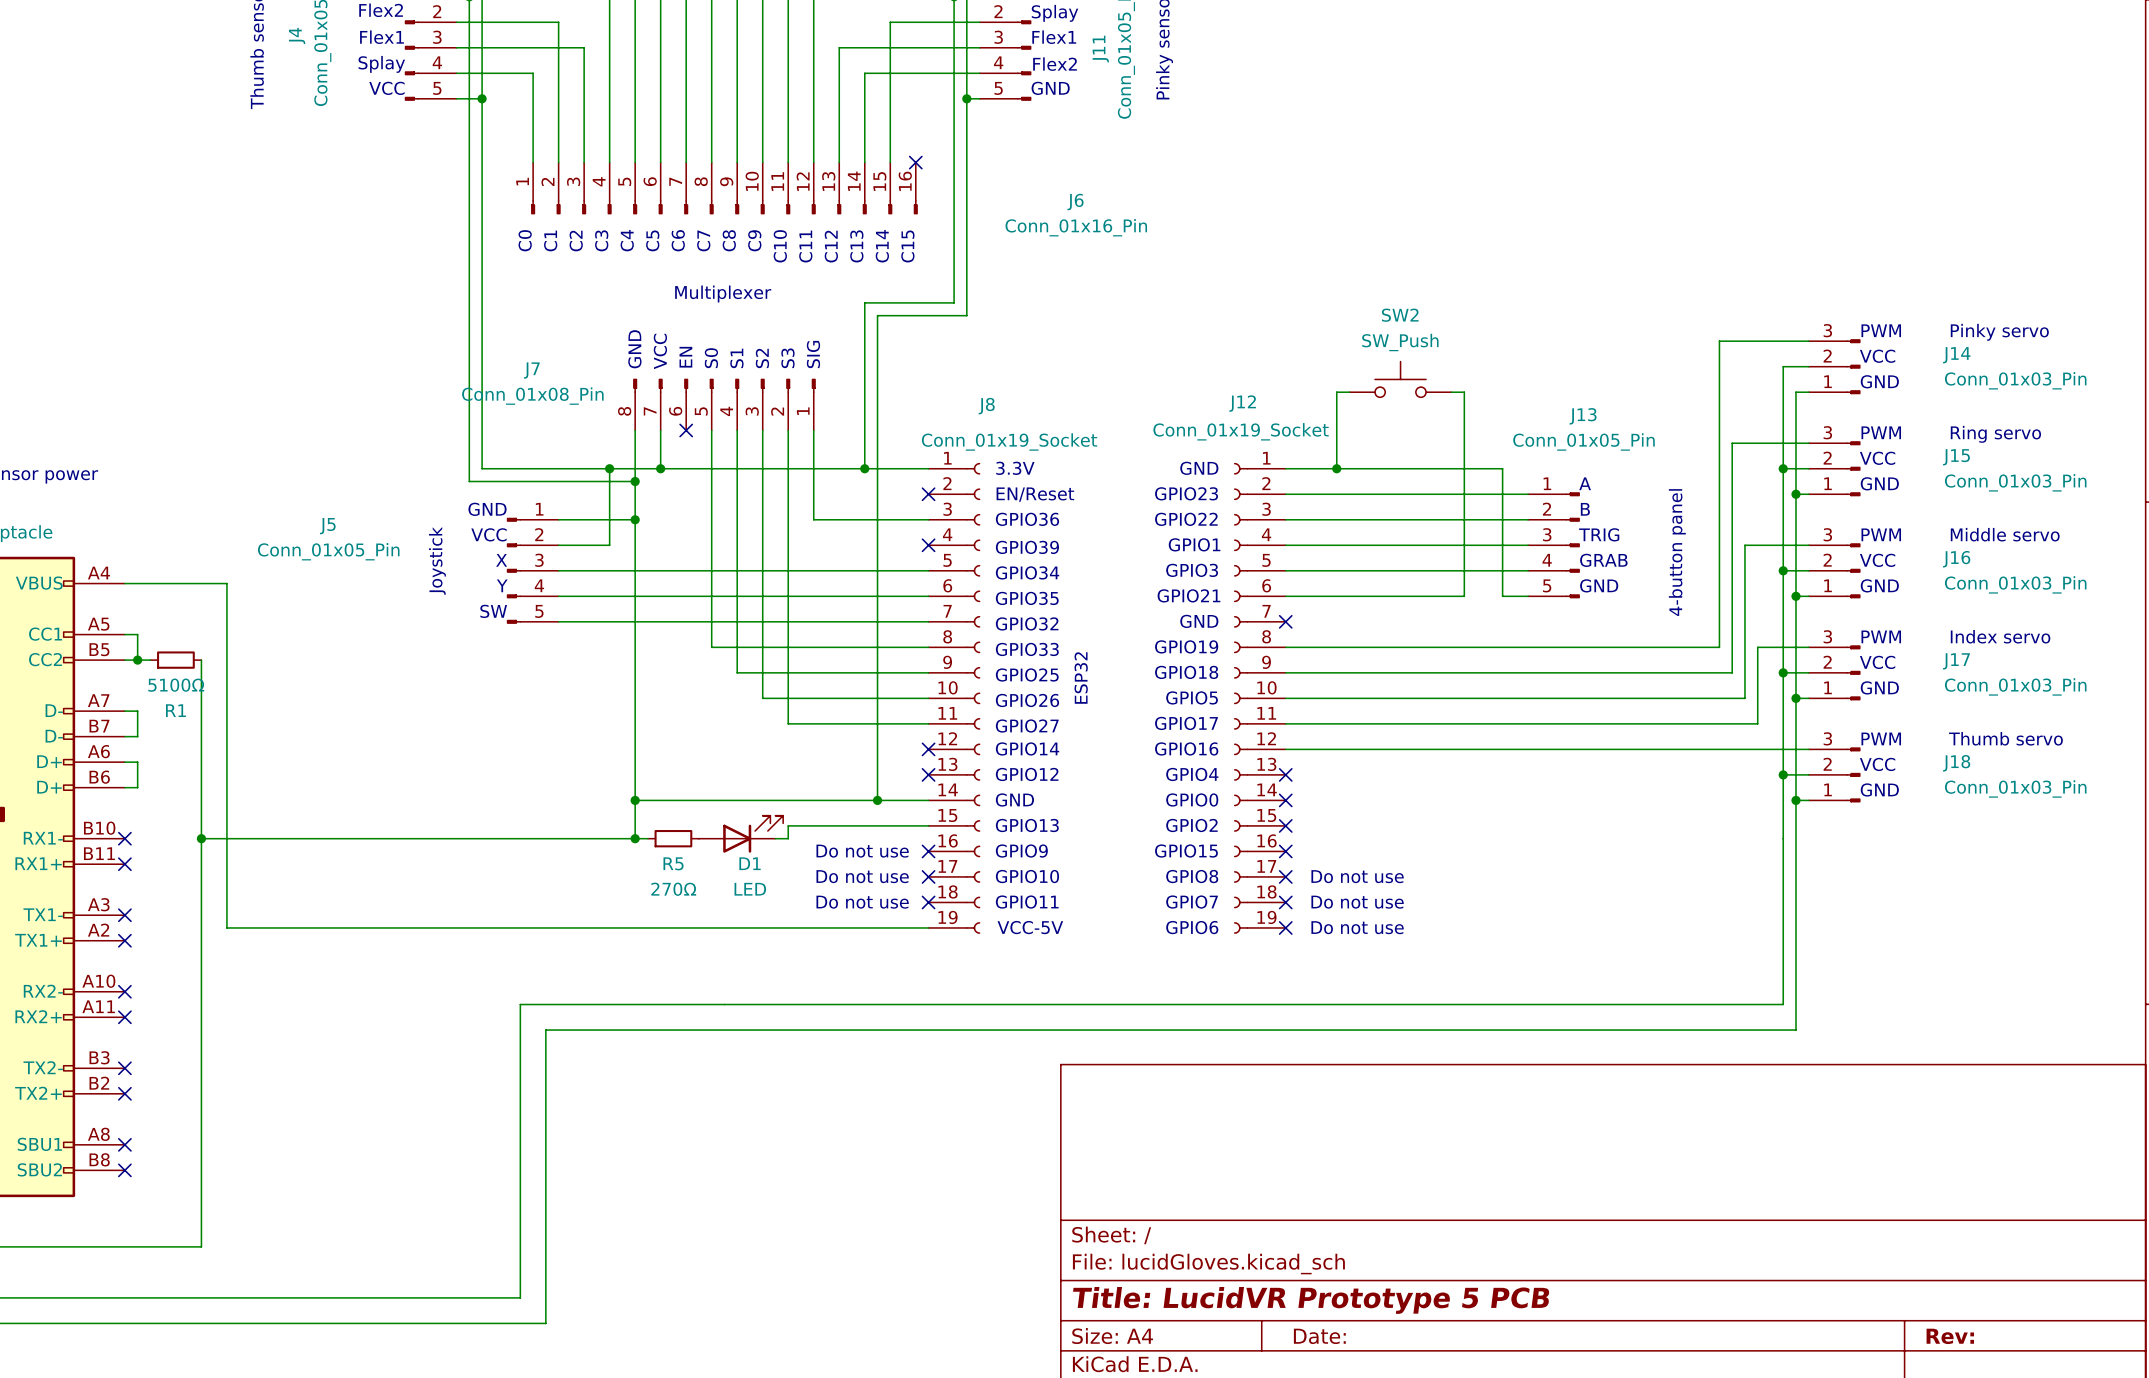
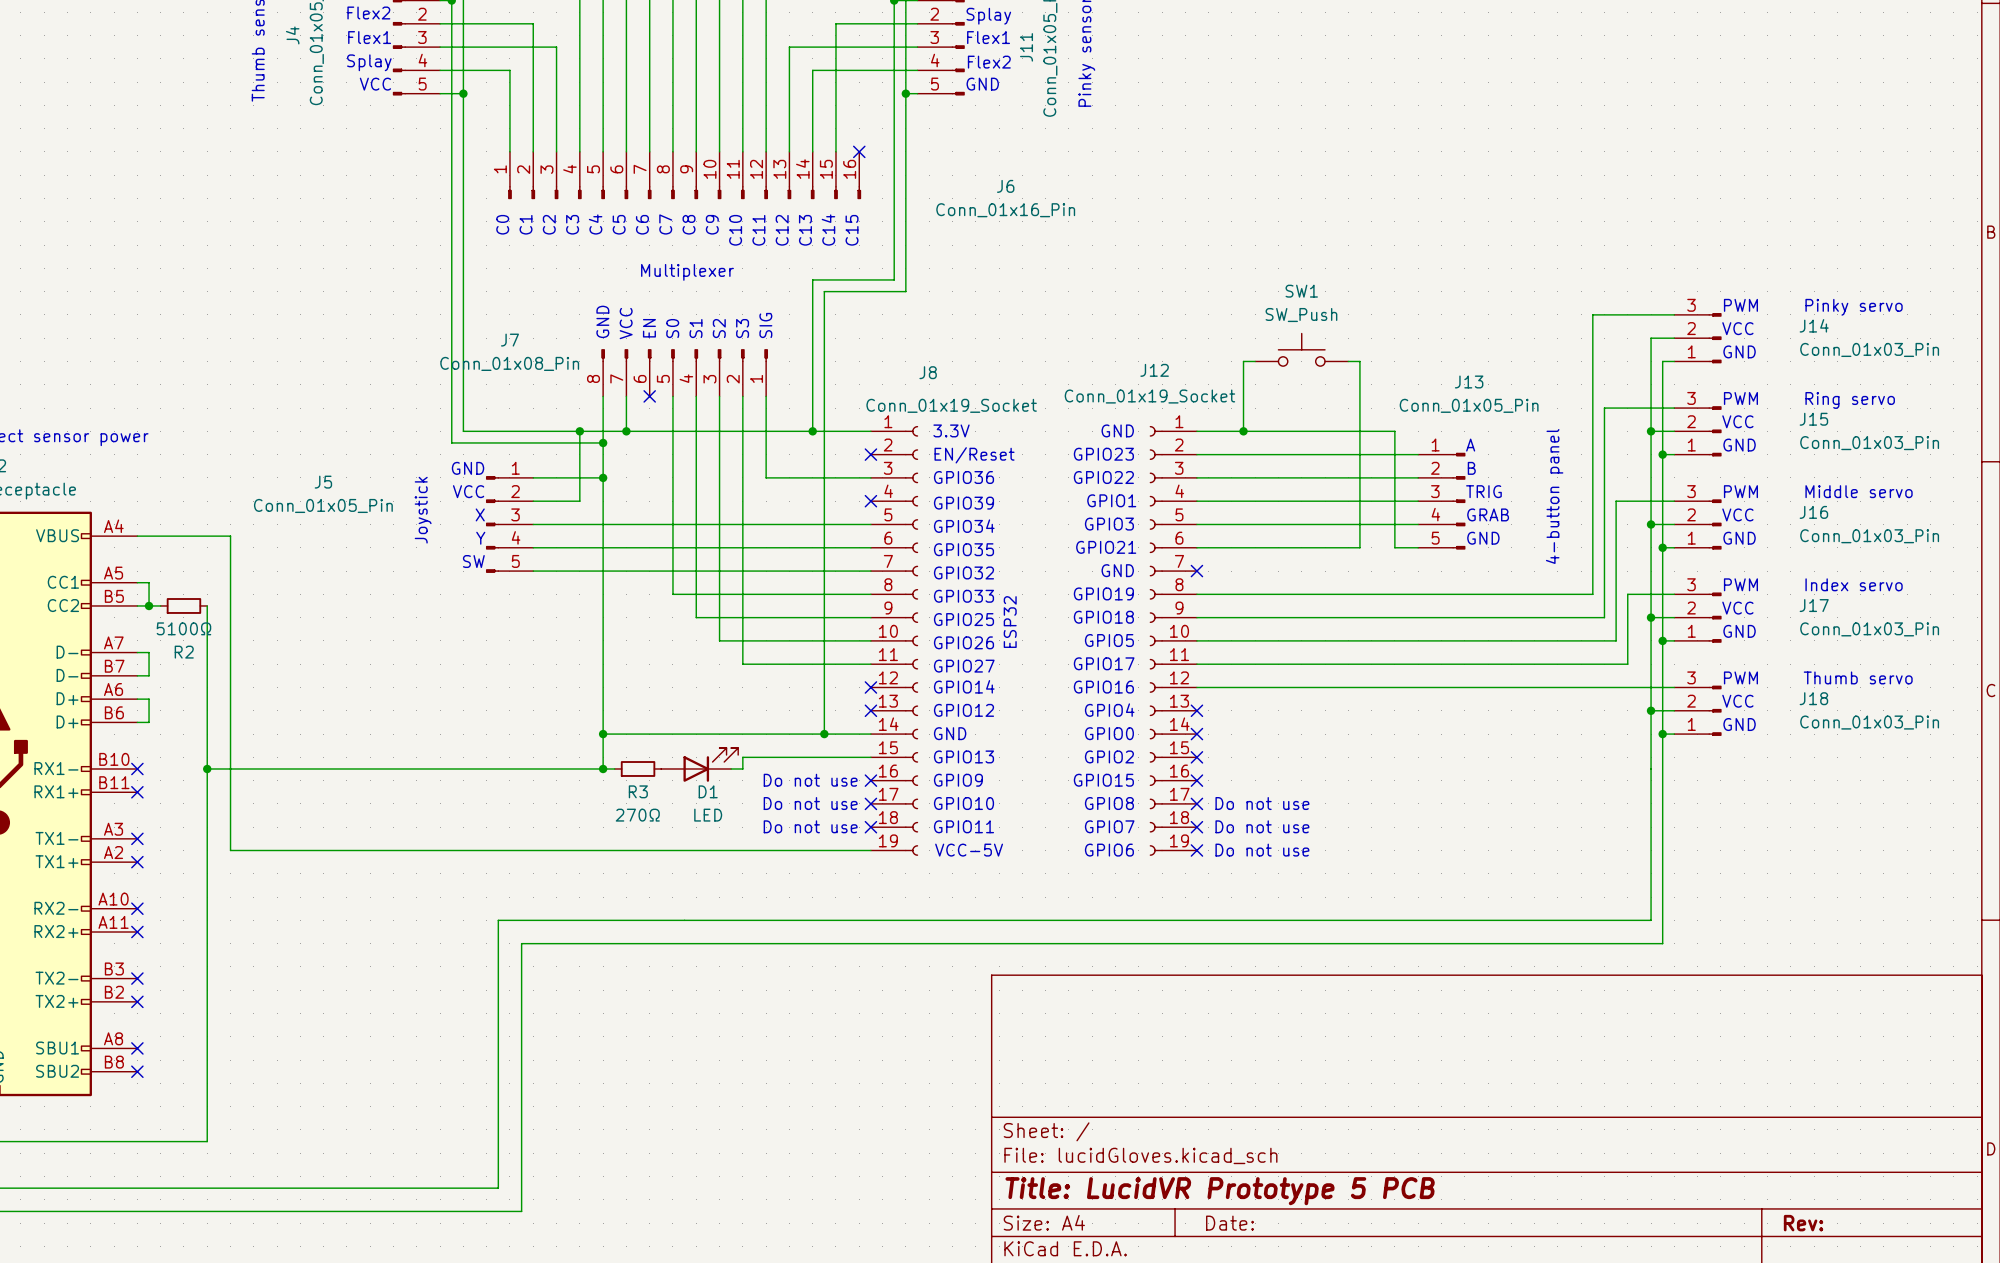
SW2 name: SW2 (1400, 315) -> SW1 (1301, 291)
R1 name: R1 (175, 710) -> R2 (184, 652)
R5 name: R5 (673, 863) -> R3 (638, 791)

